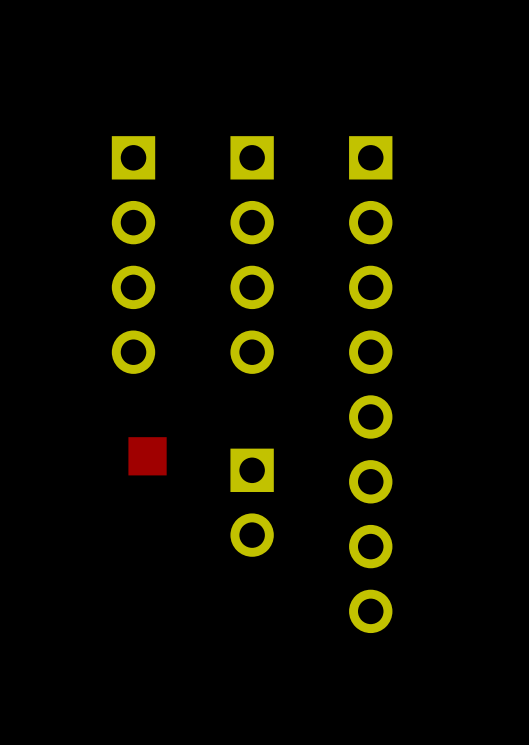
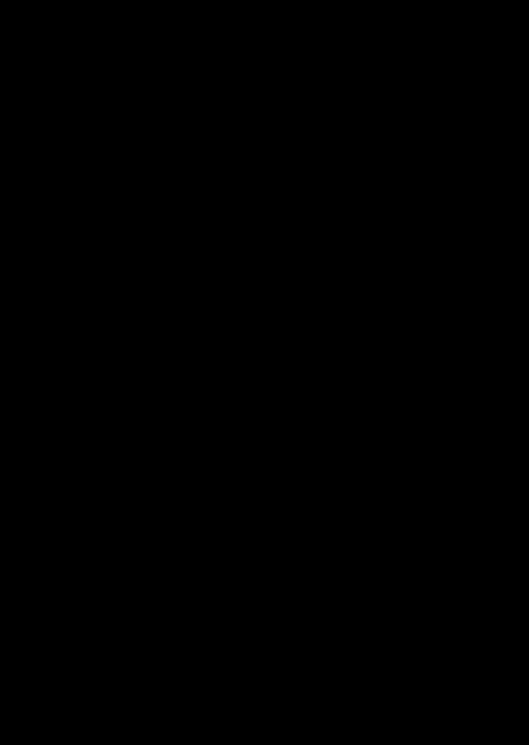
part: (133, 255) -> none
part: (252, 255) -> none
part: (370, 384) -> none
part: (147, 456) -> none
part: (252, 502) -> none

